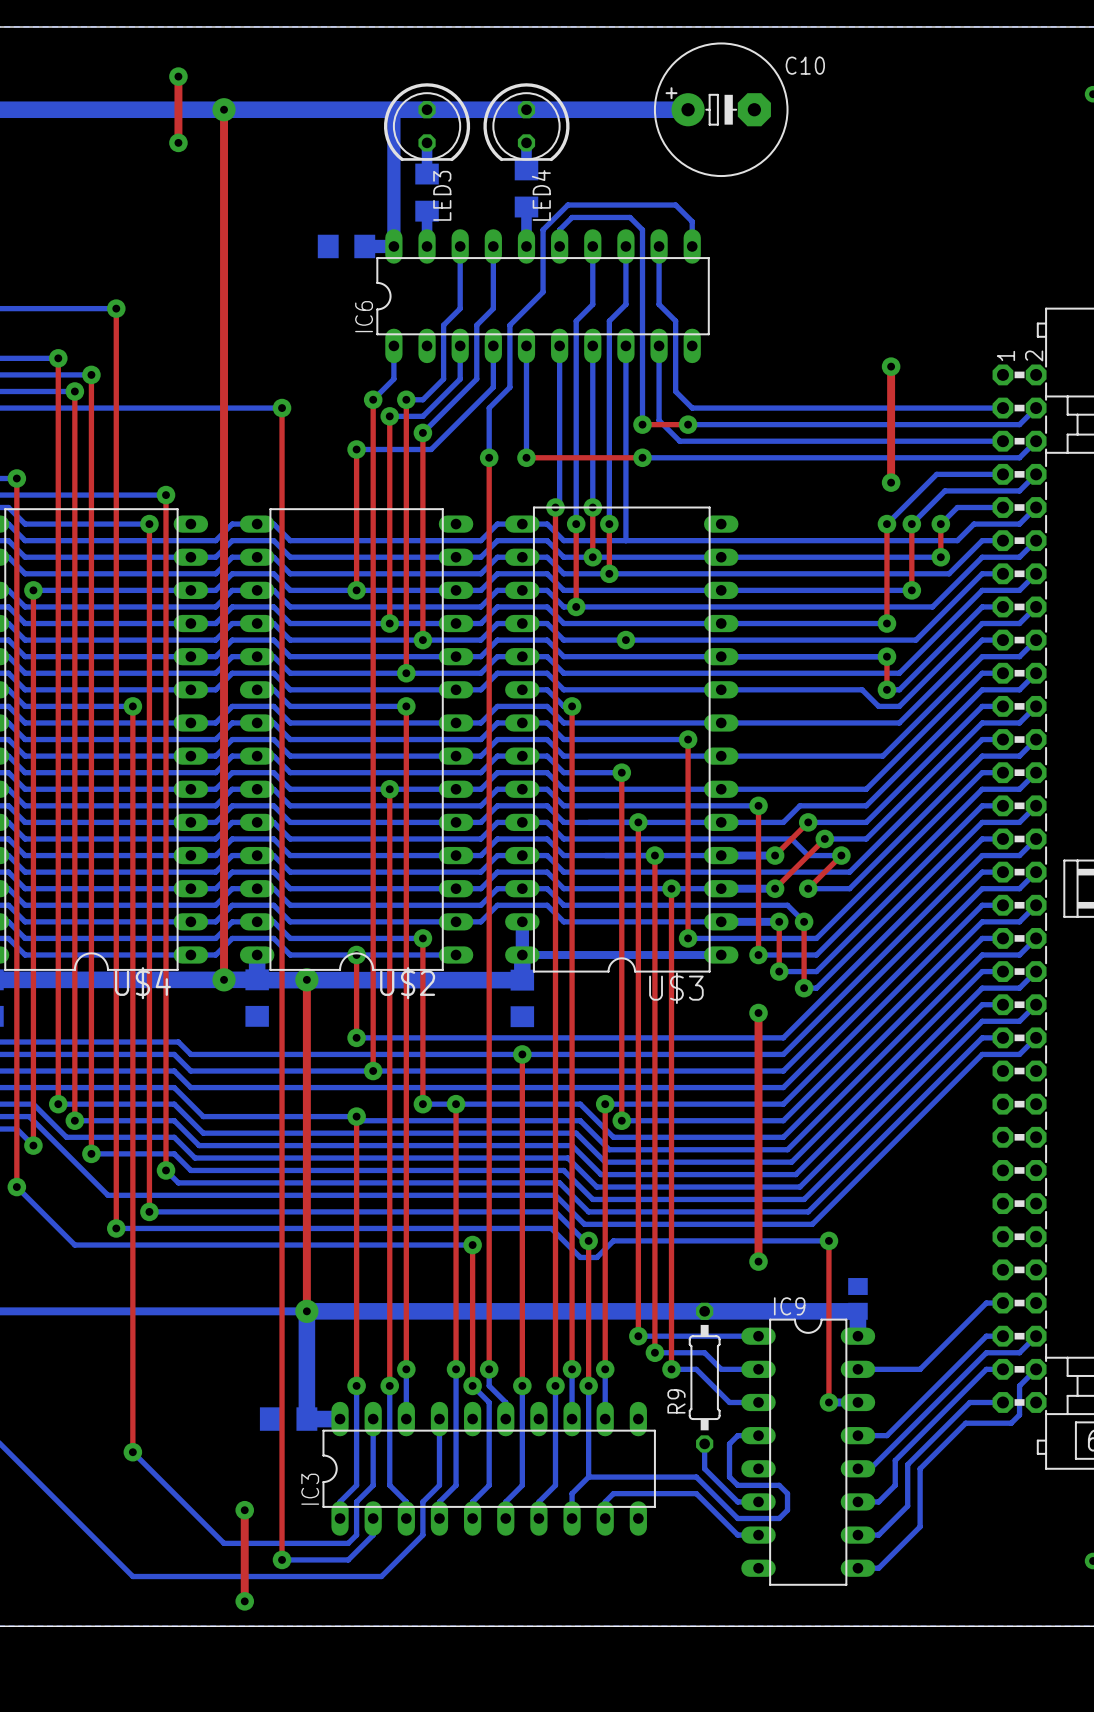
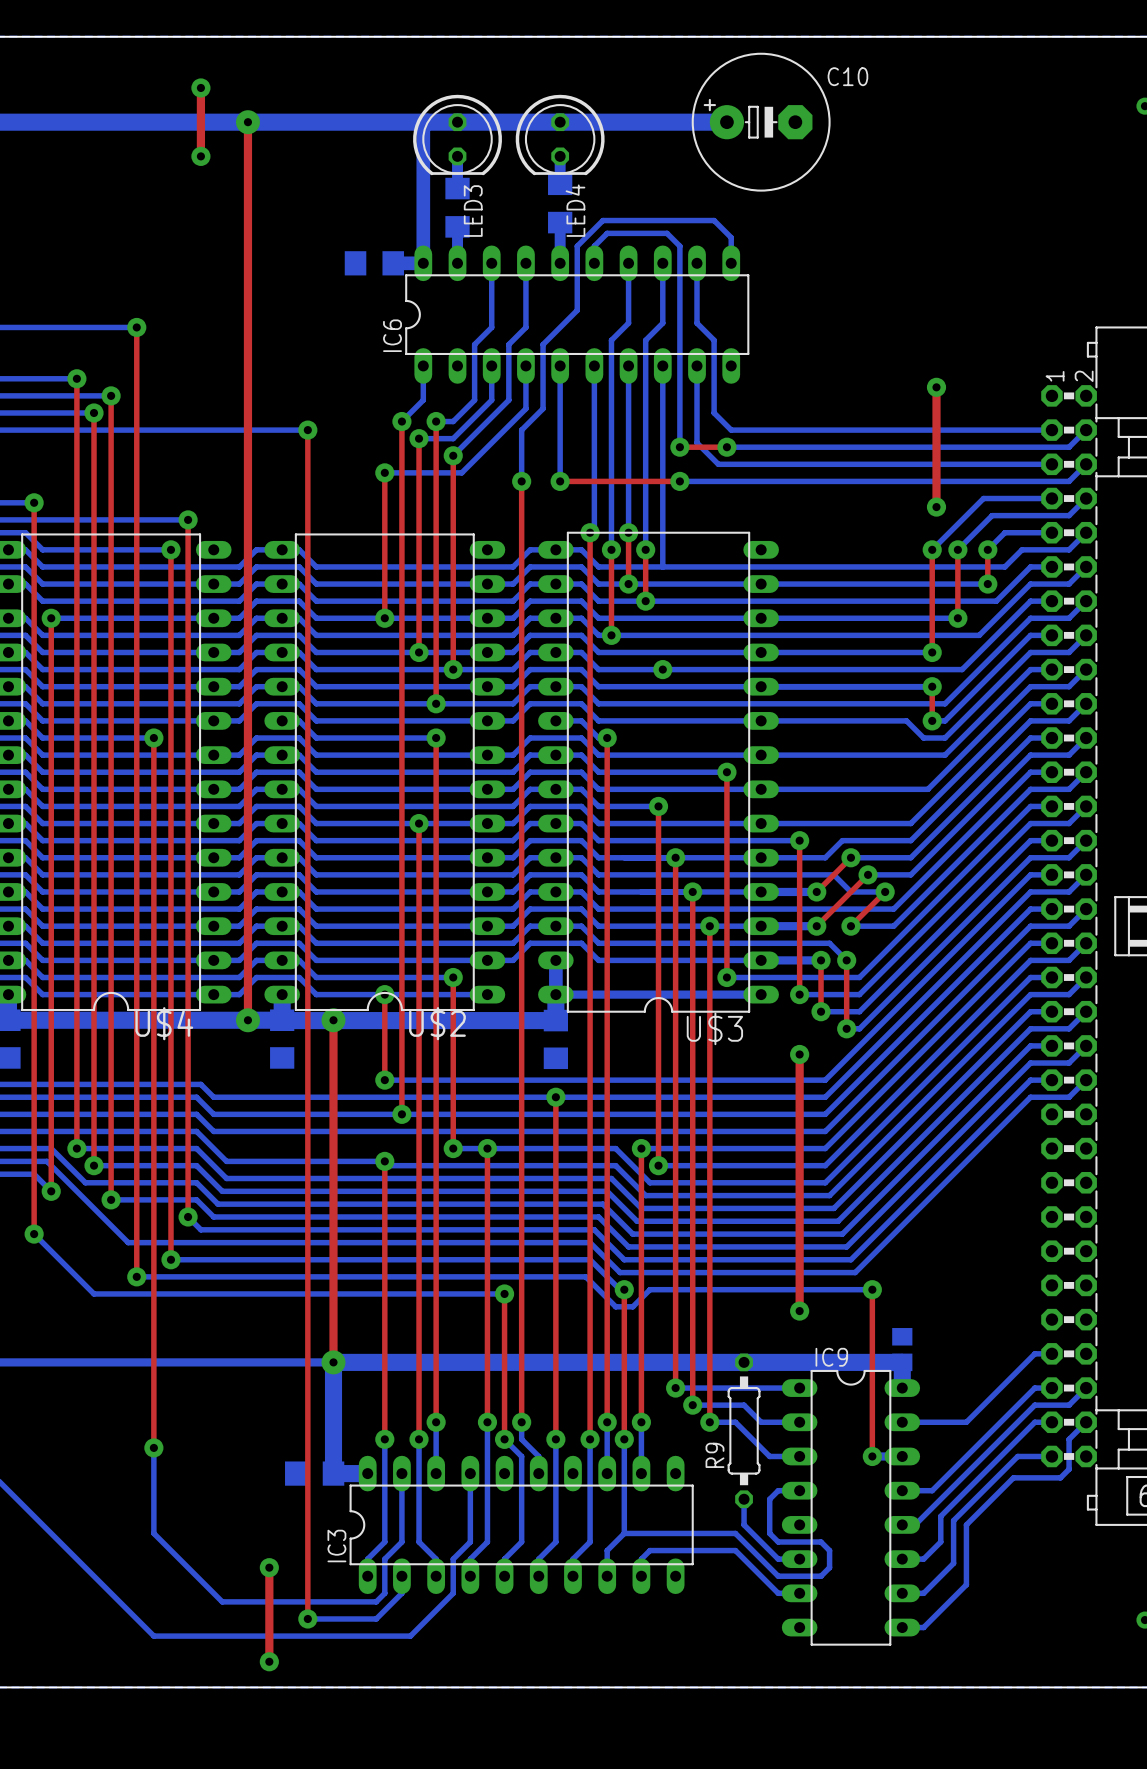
top track: (132, 1394) (132, 1452) -> none
bottom track: (132, 1452) (224, 1543) -> (153, 1447) (153, 1533) (222, 1601) (247, 1601)
via position: (132, 1452) -> (153, 1447)

